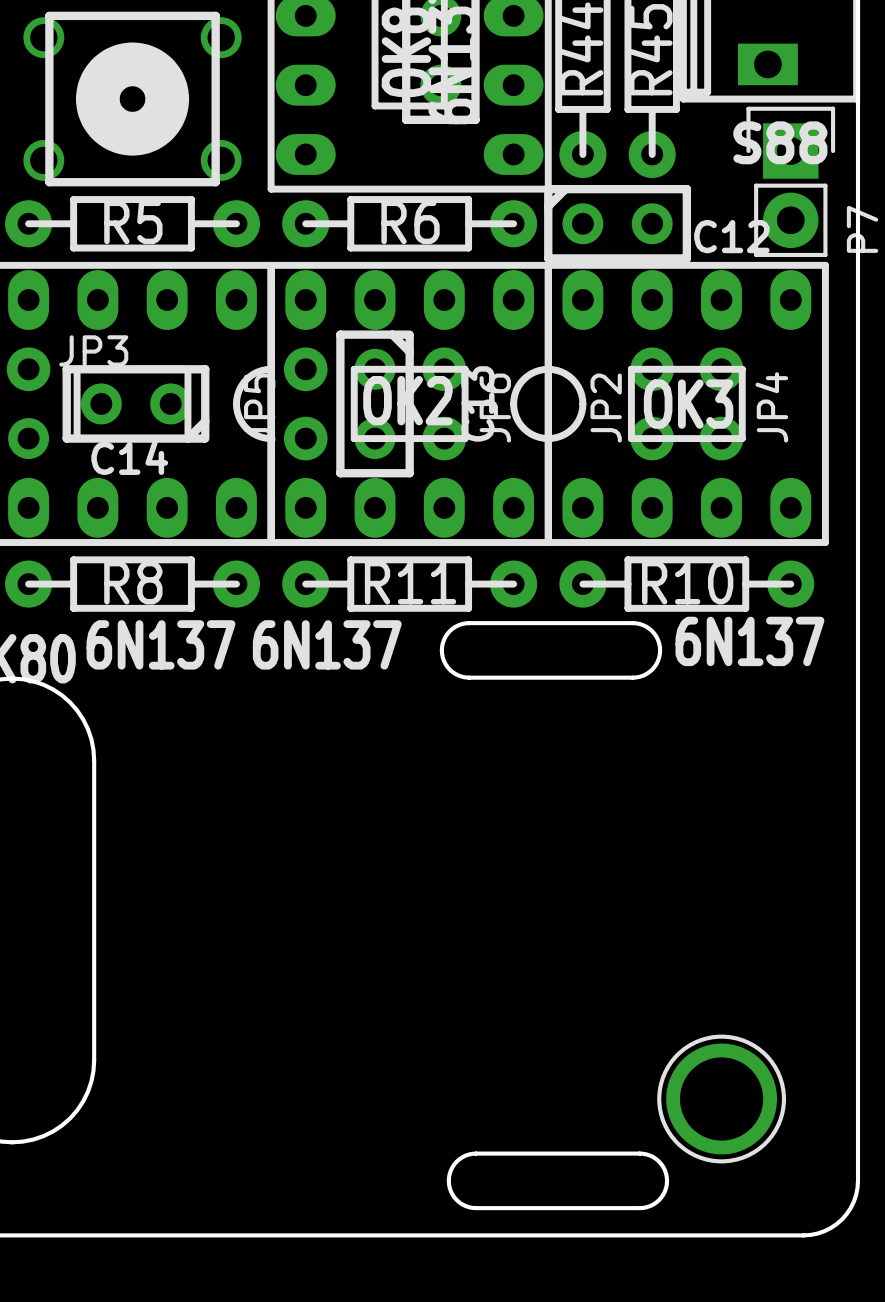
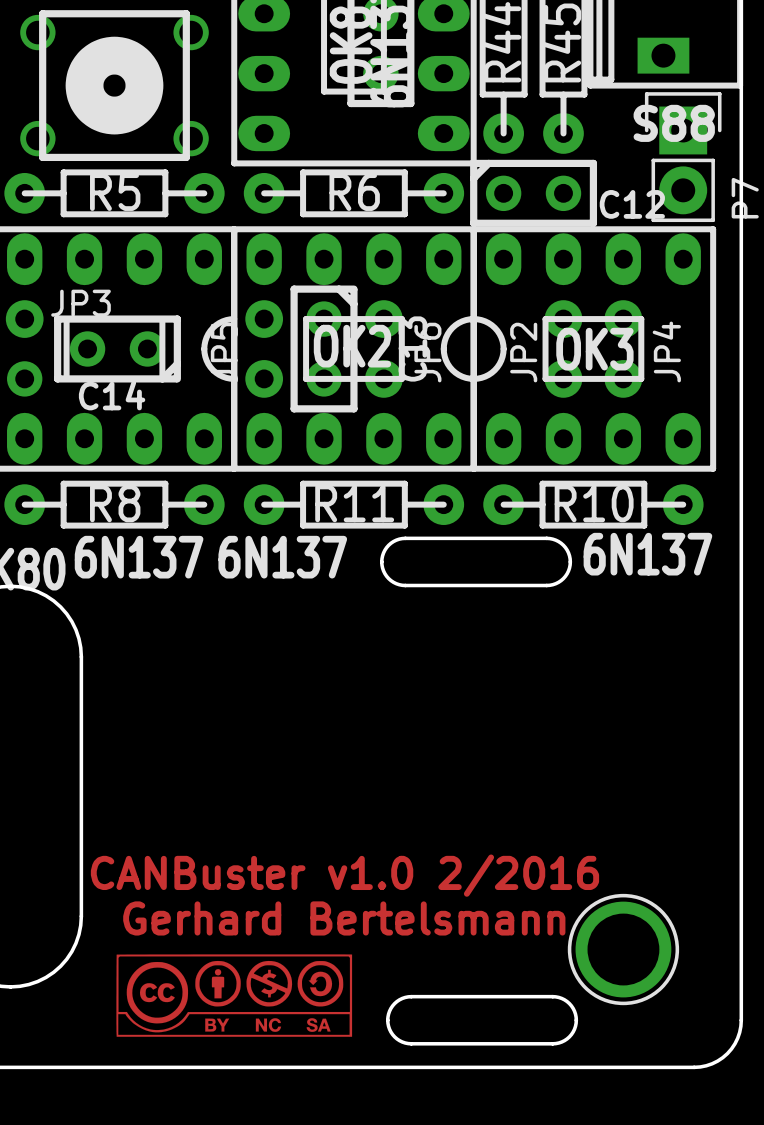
text: none -> CANBuster v1.0 2/2016 (344, 875)
text: none -> Gerhard Bertelsmann (344, 918)
drawing: none -> [116, 954, 353, 1037]

